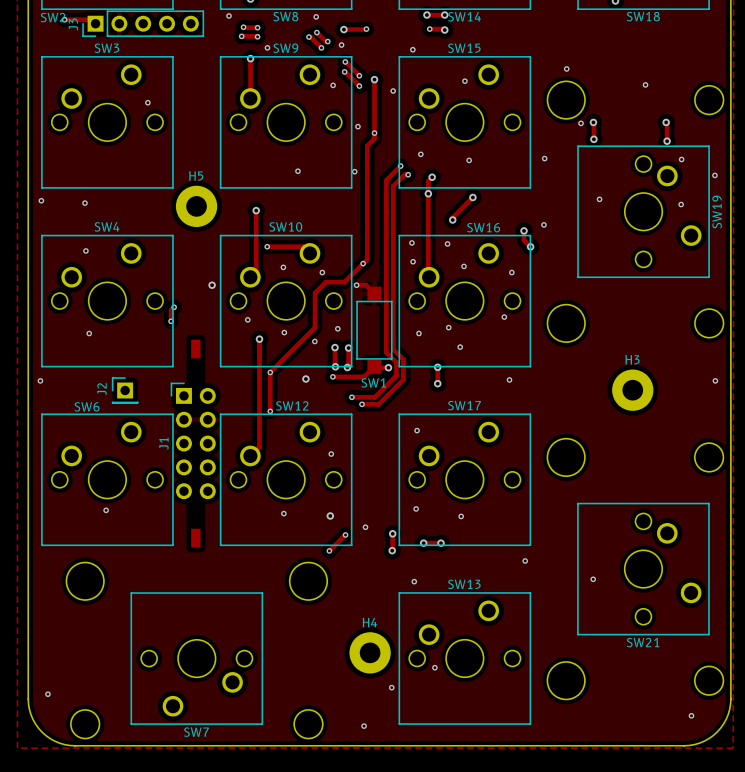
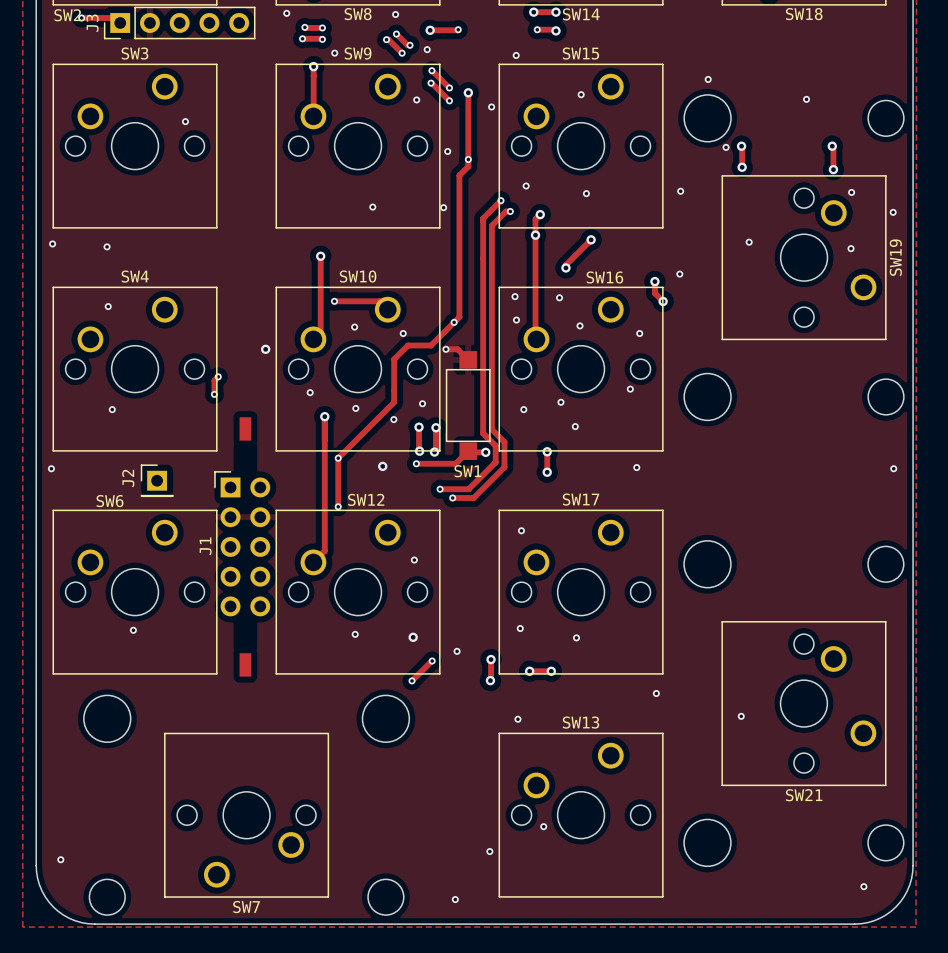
H5: (196, 206) -> none
H3: (632, 390) -> none
H4: (370, 652) -> none

